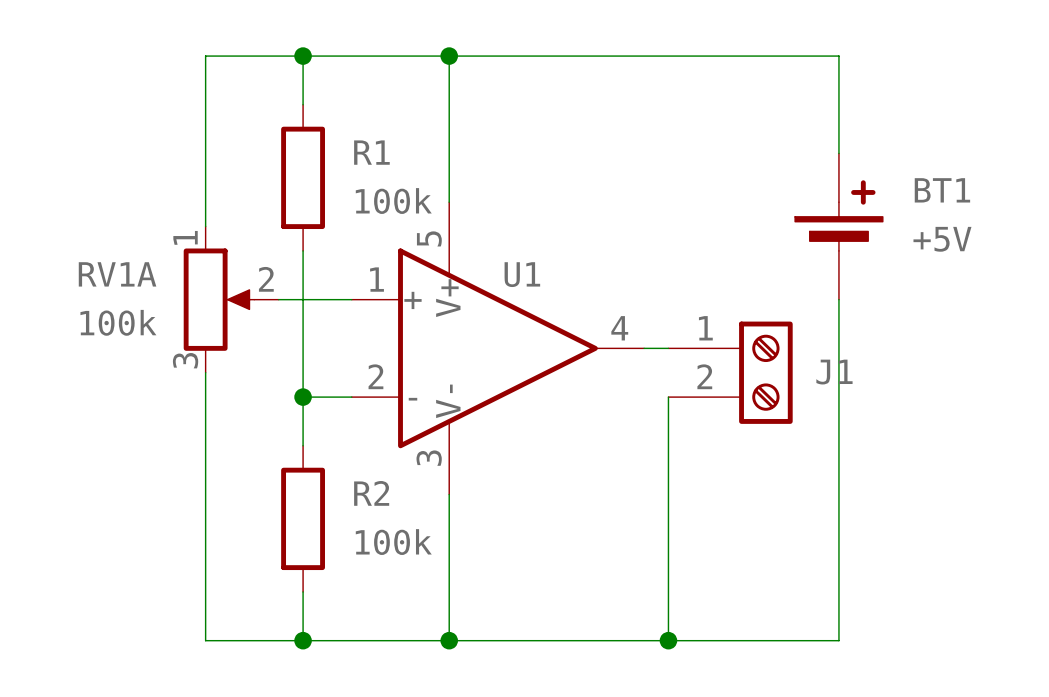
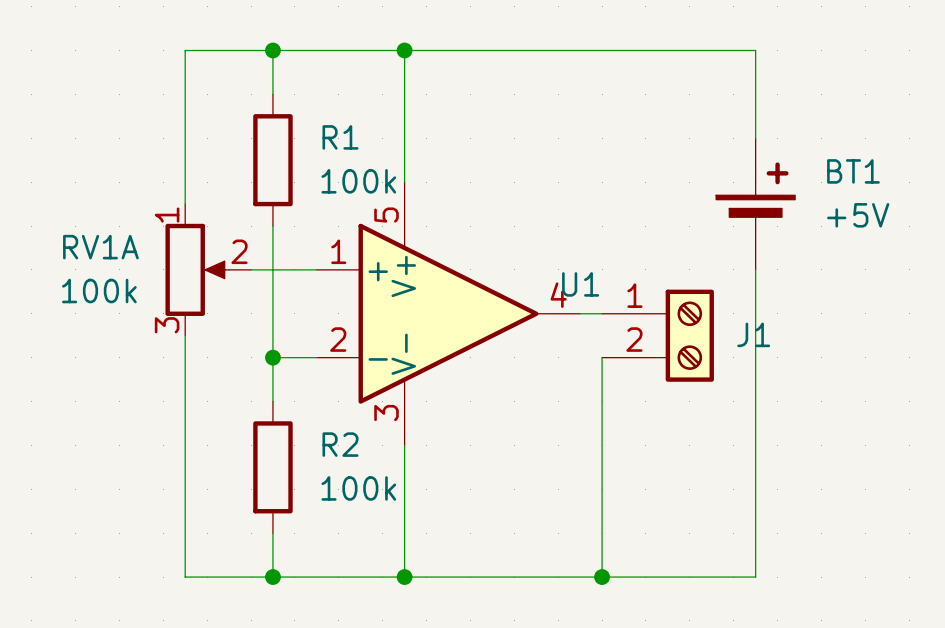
U1 name position: U1 (522, 274) -> U1 (580, 284)

